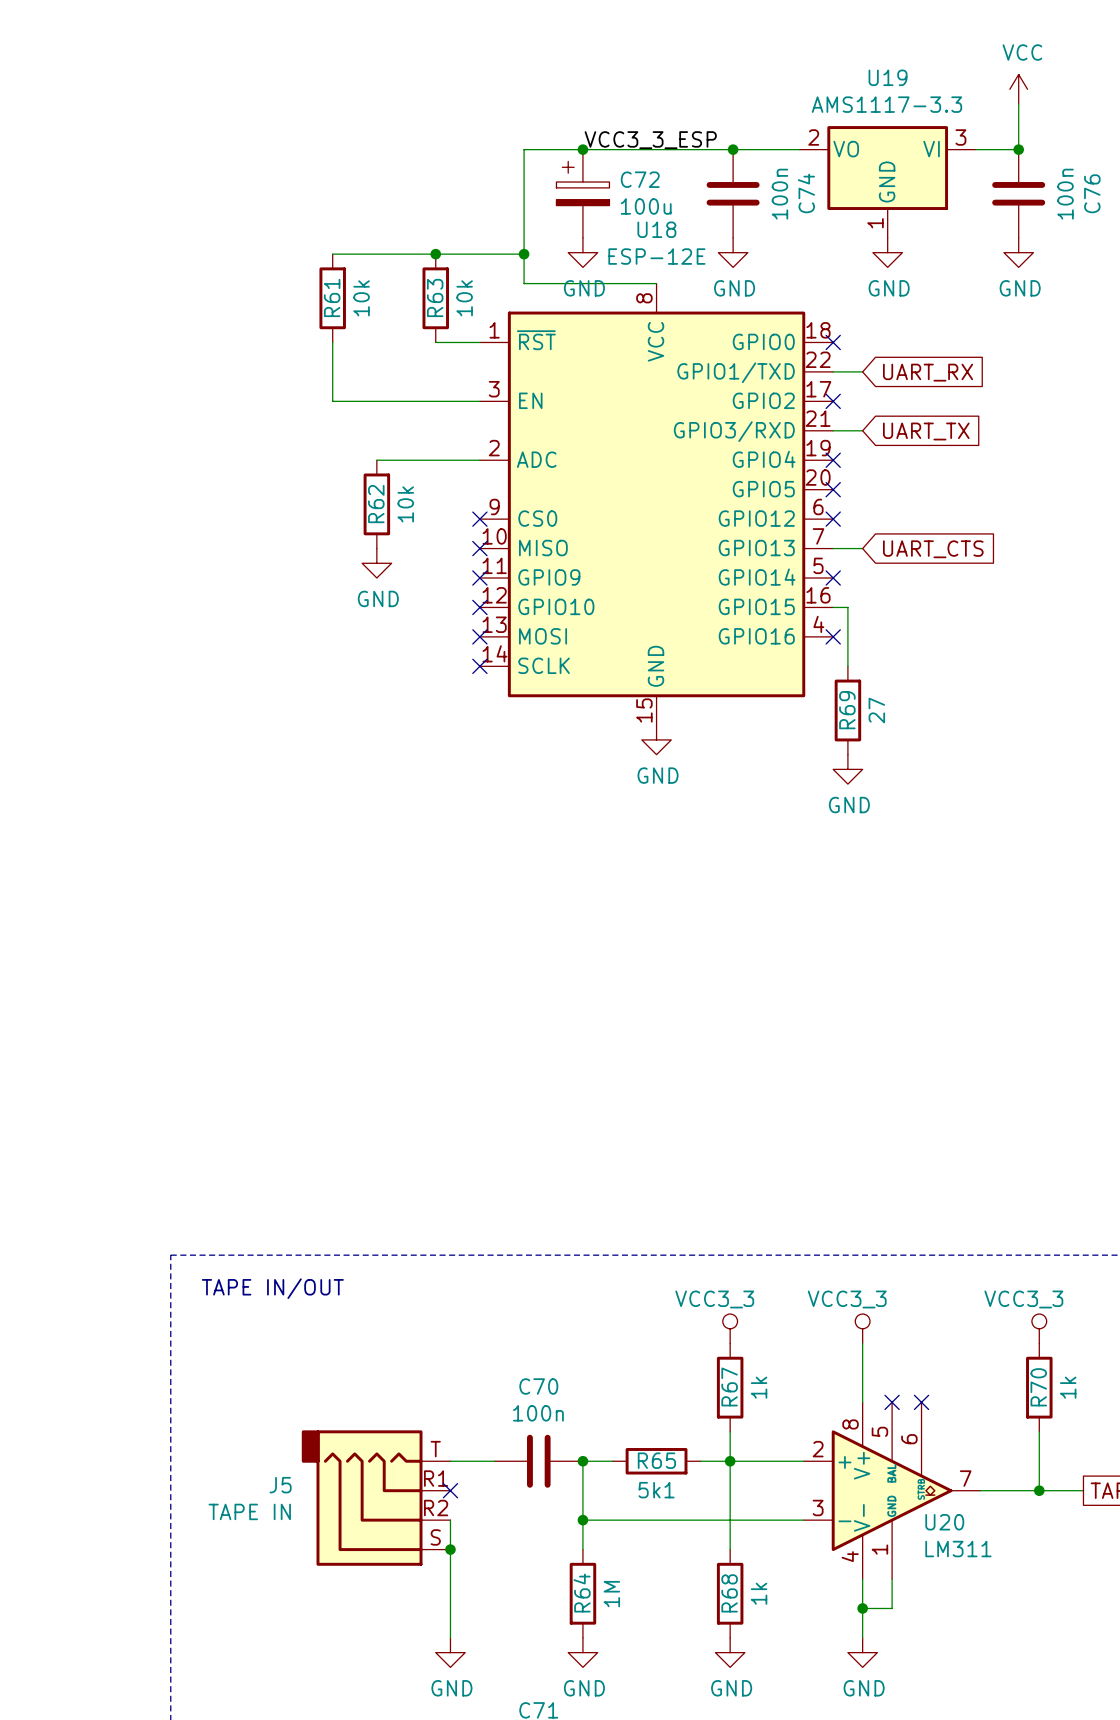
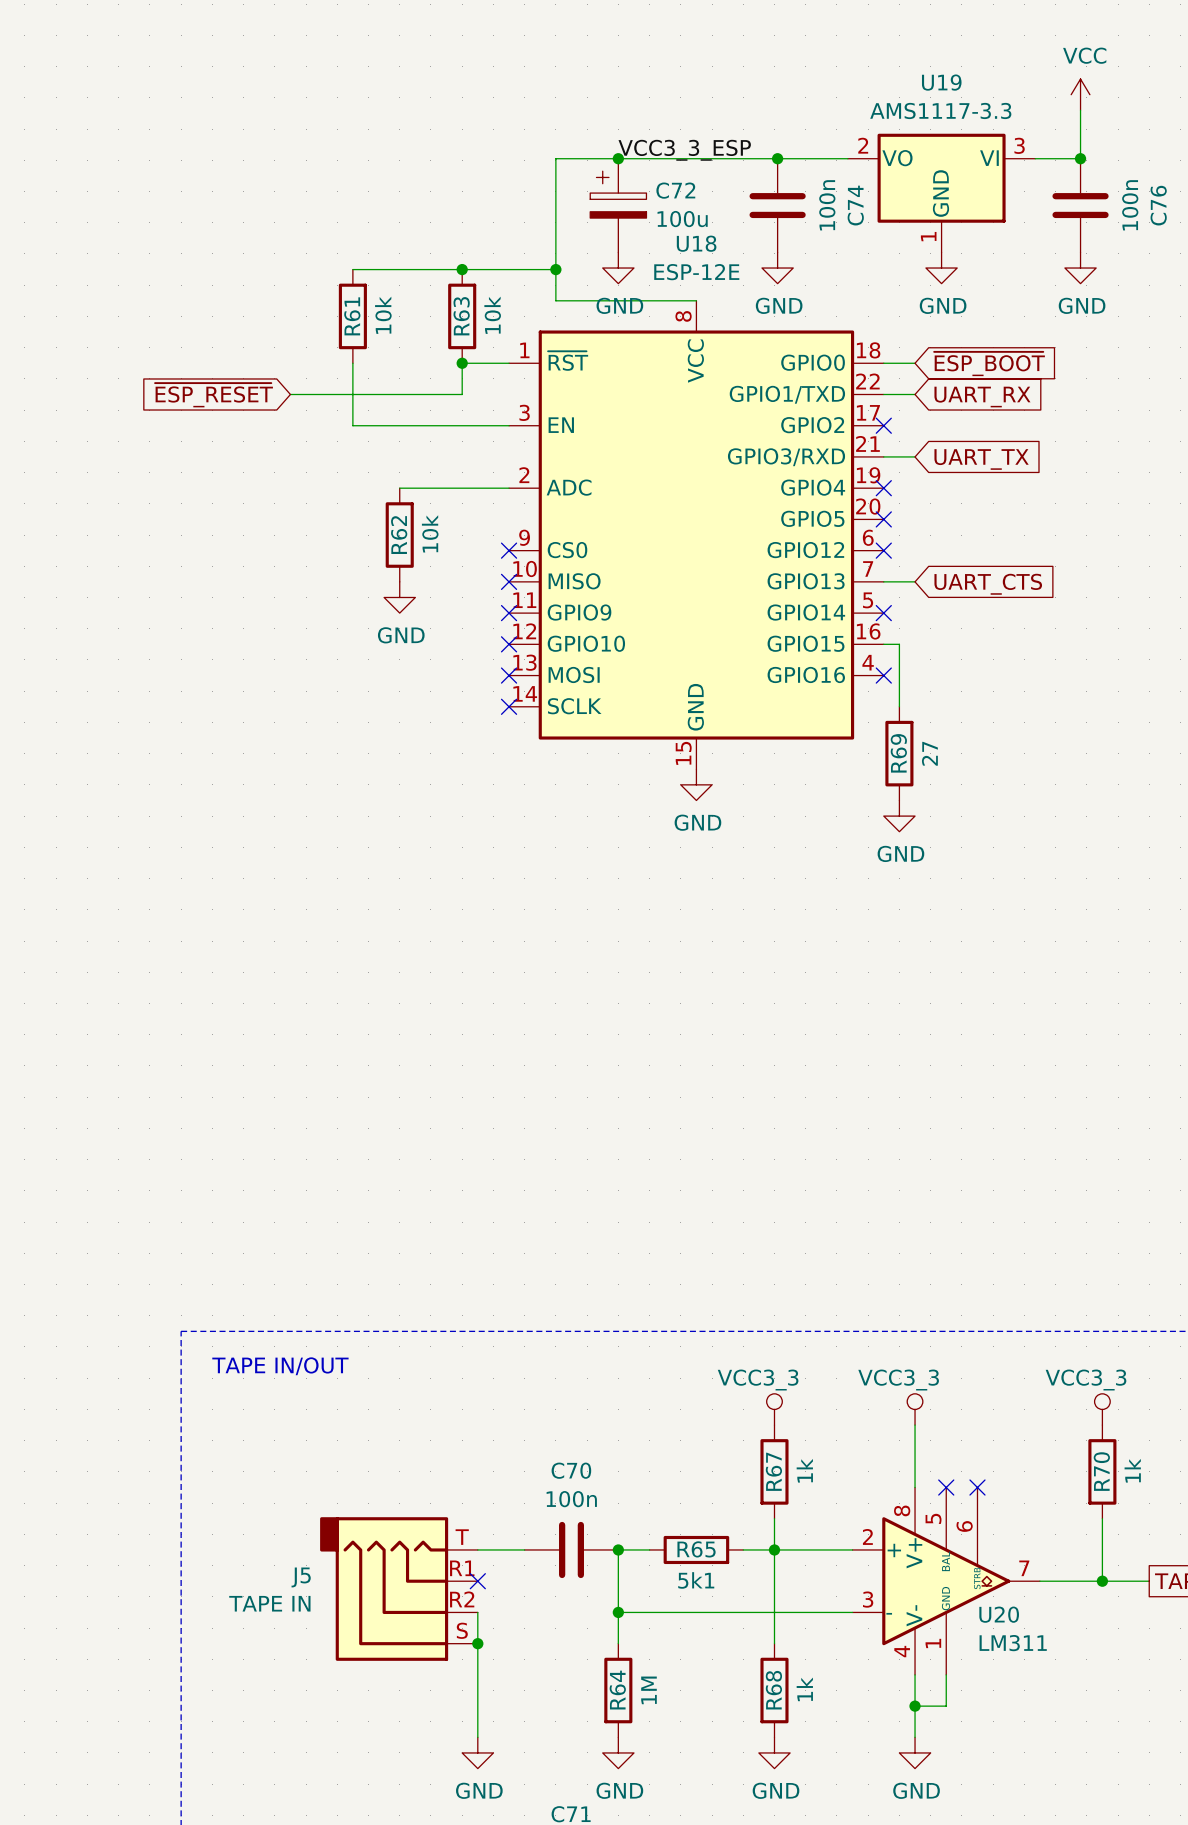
global label: none -> ~{ESP_BOOT} (989, 363)
wire: none -> (462, 363) (462, 394) (290, 394)
junction: none -> (462, 363)
wire: none -> (883, 363) (915, 363)
no-connect mark: (833, 342) -> none
global label: none -> ~{ESP_RESET} (213, 395)

